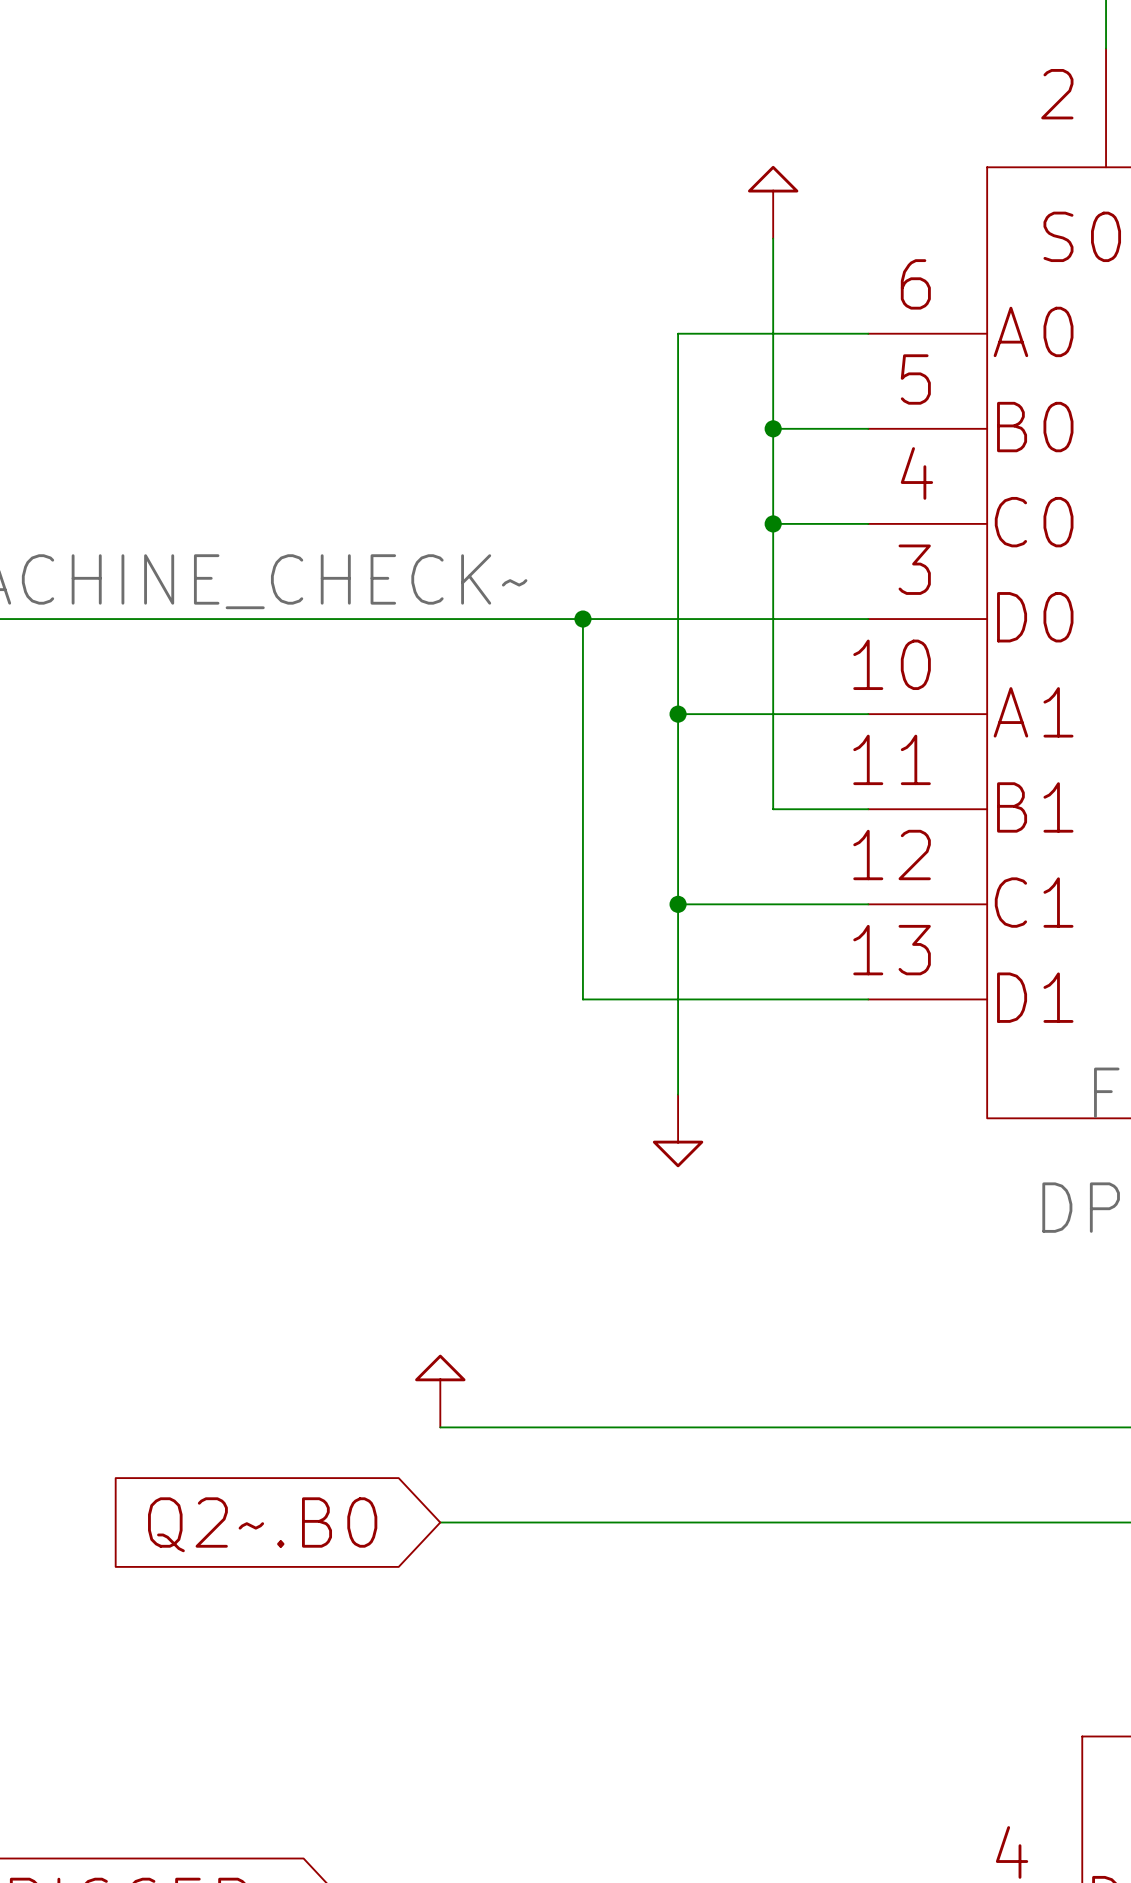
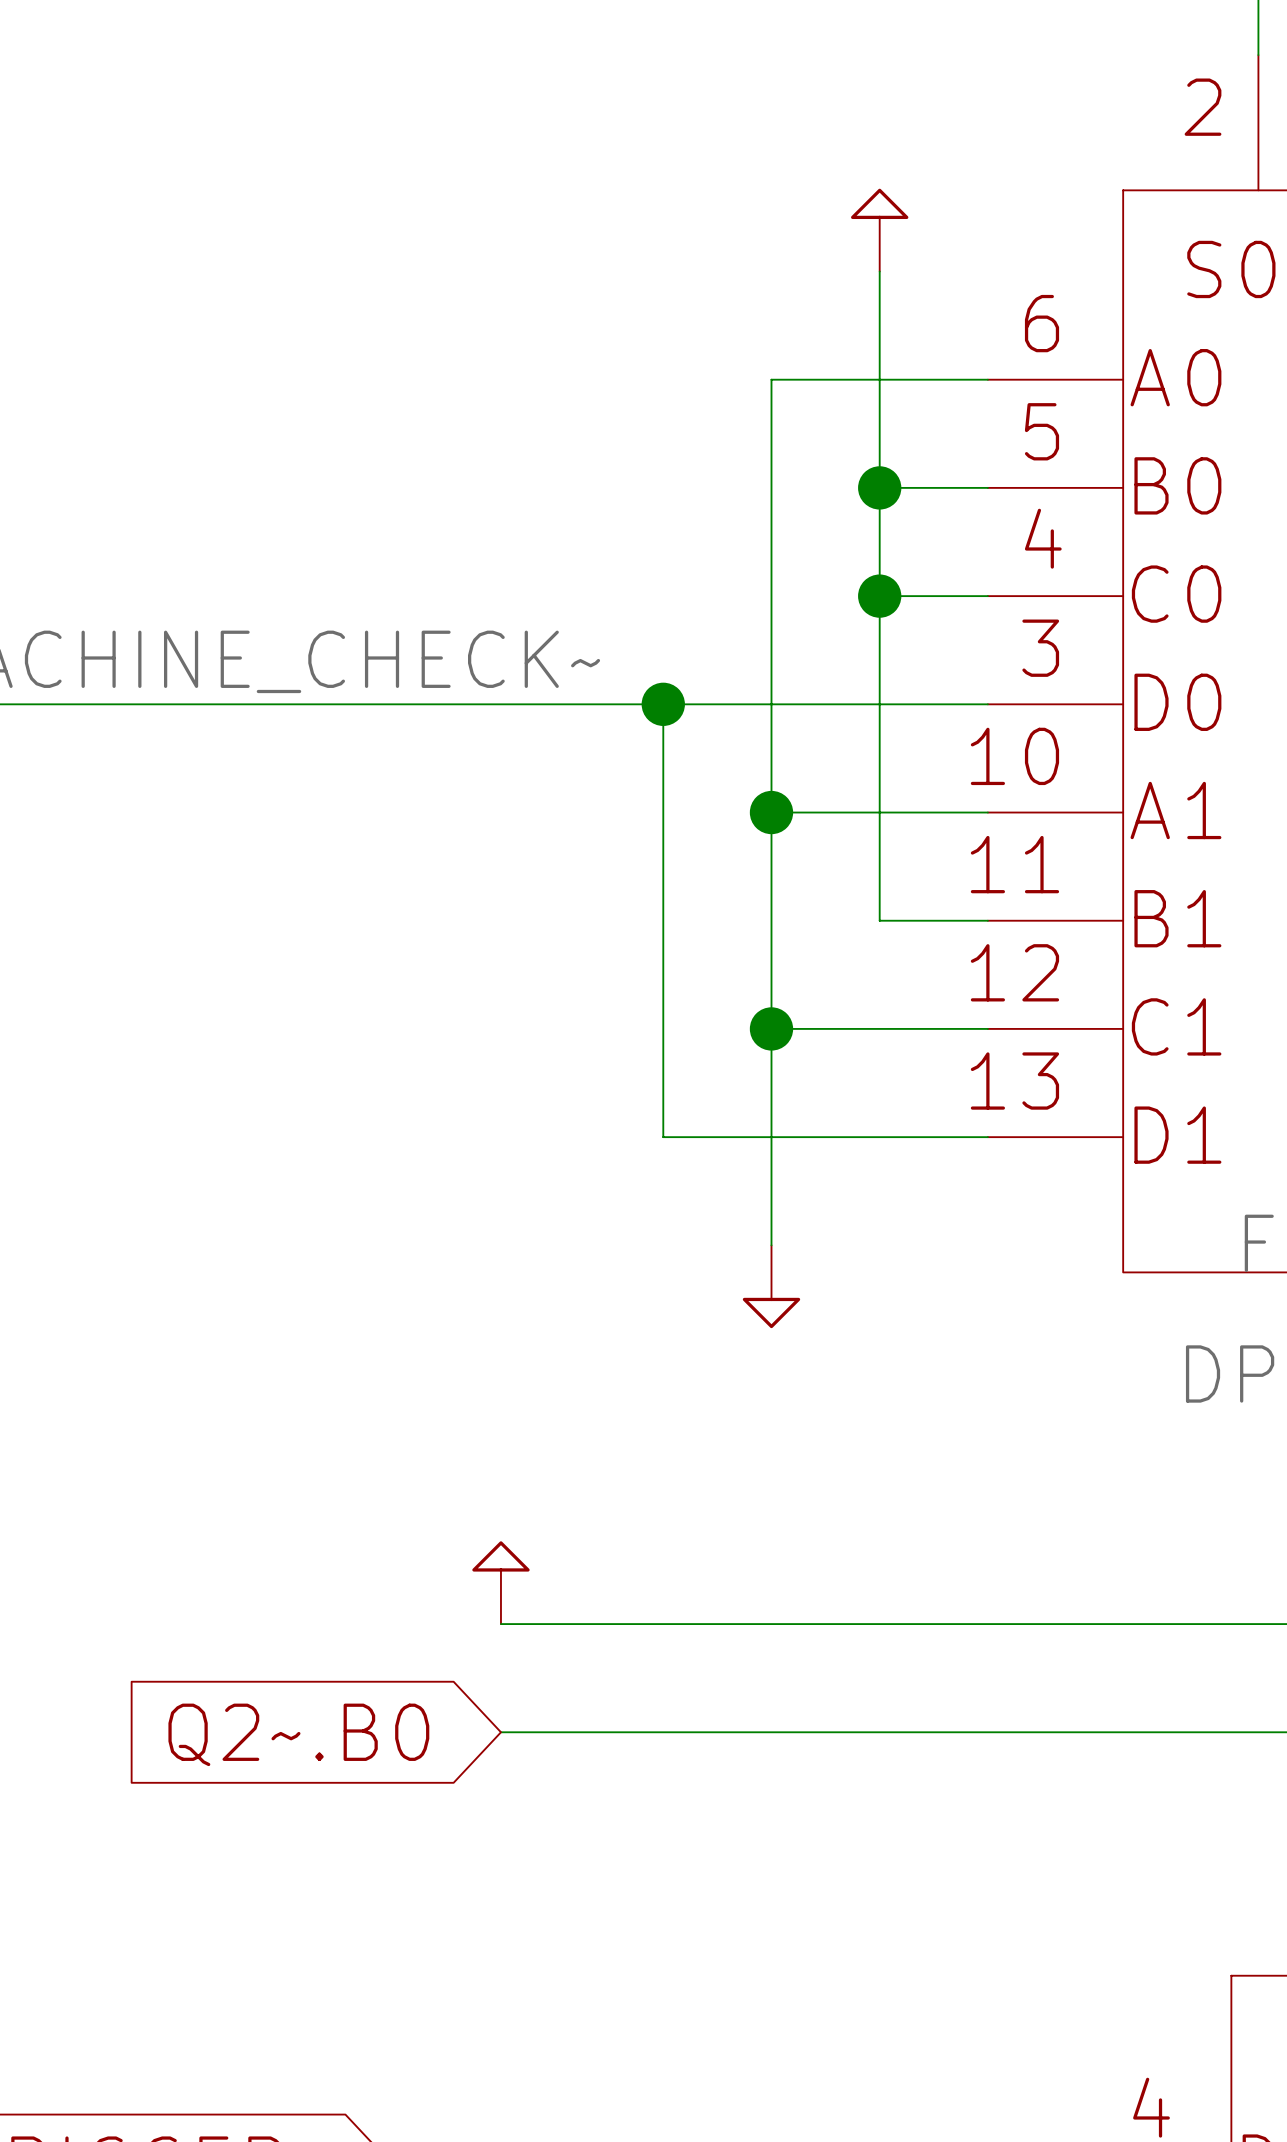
junction size: [764, 420, 782, 438] -> [858, 466, 902, 510]
junction size: [764, 515, 782, 533] -> [858, 574, 902, 618]
junction size: [574, 610, 592, 628] -> [641, 682, 685, 726]
junction size: [669, 705, 687, 723] -> [749, 790, 794, 835]
junction size: [669, 895, 687, 913] -> [749, 1007, 794, 1051]

